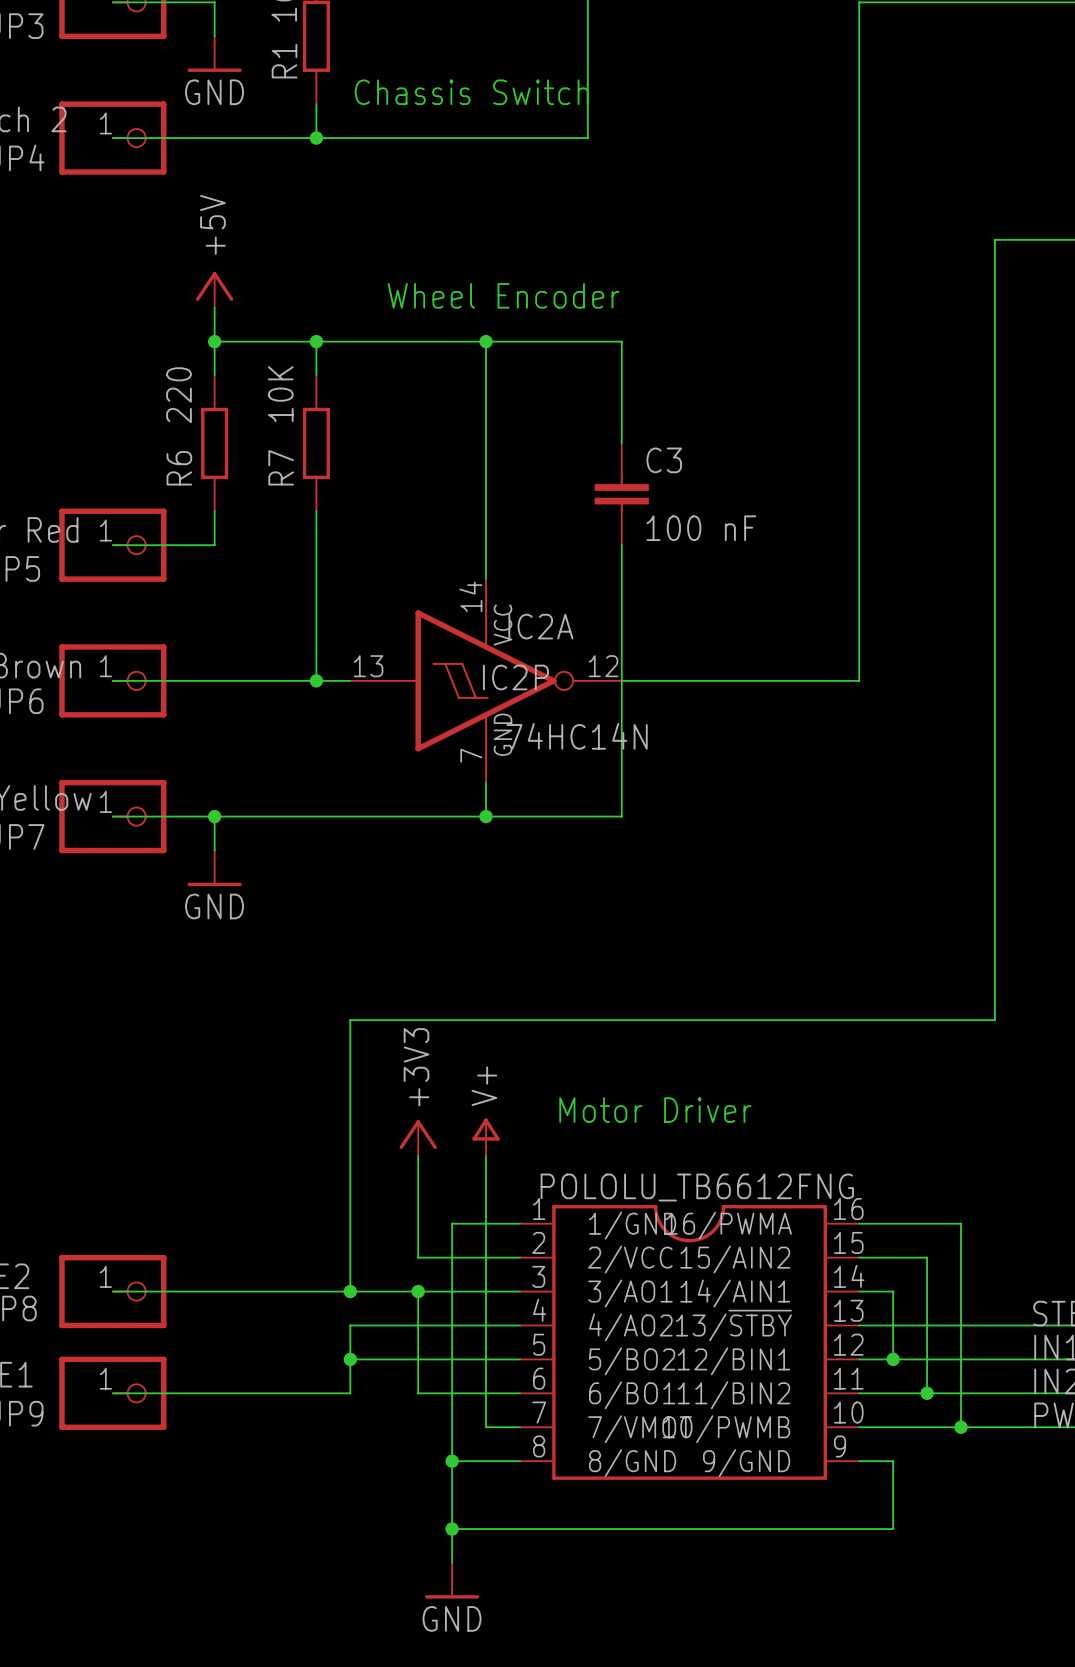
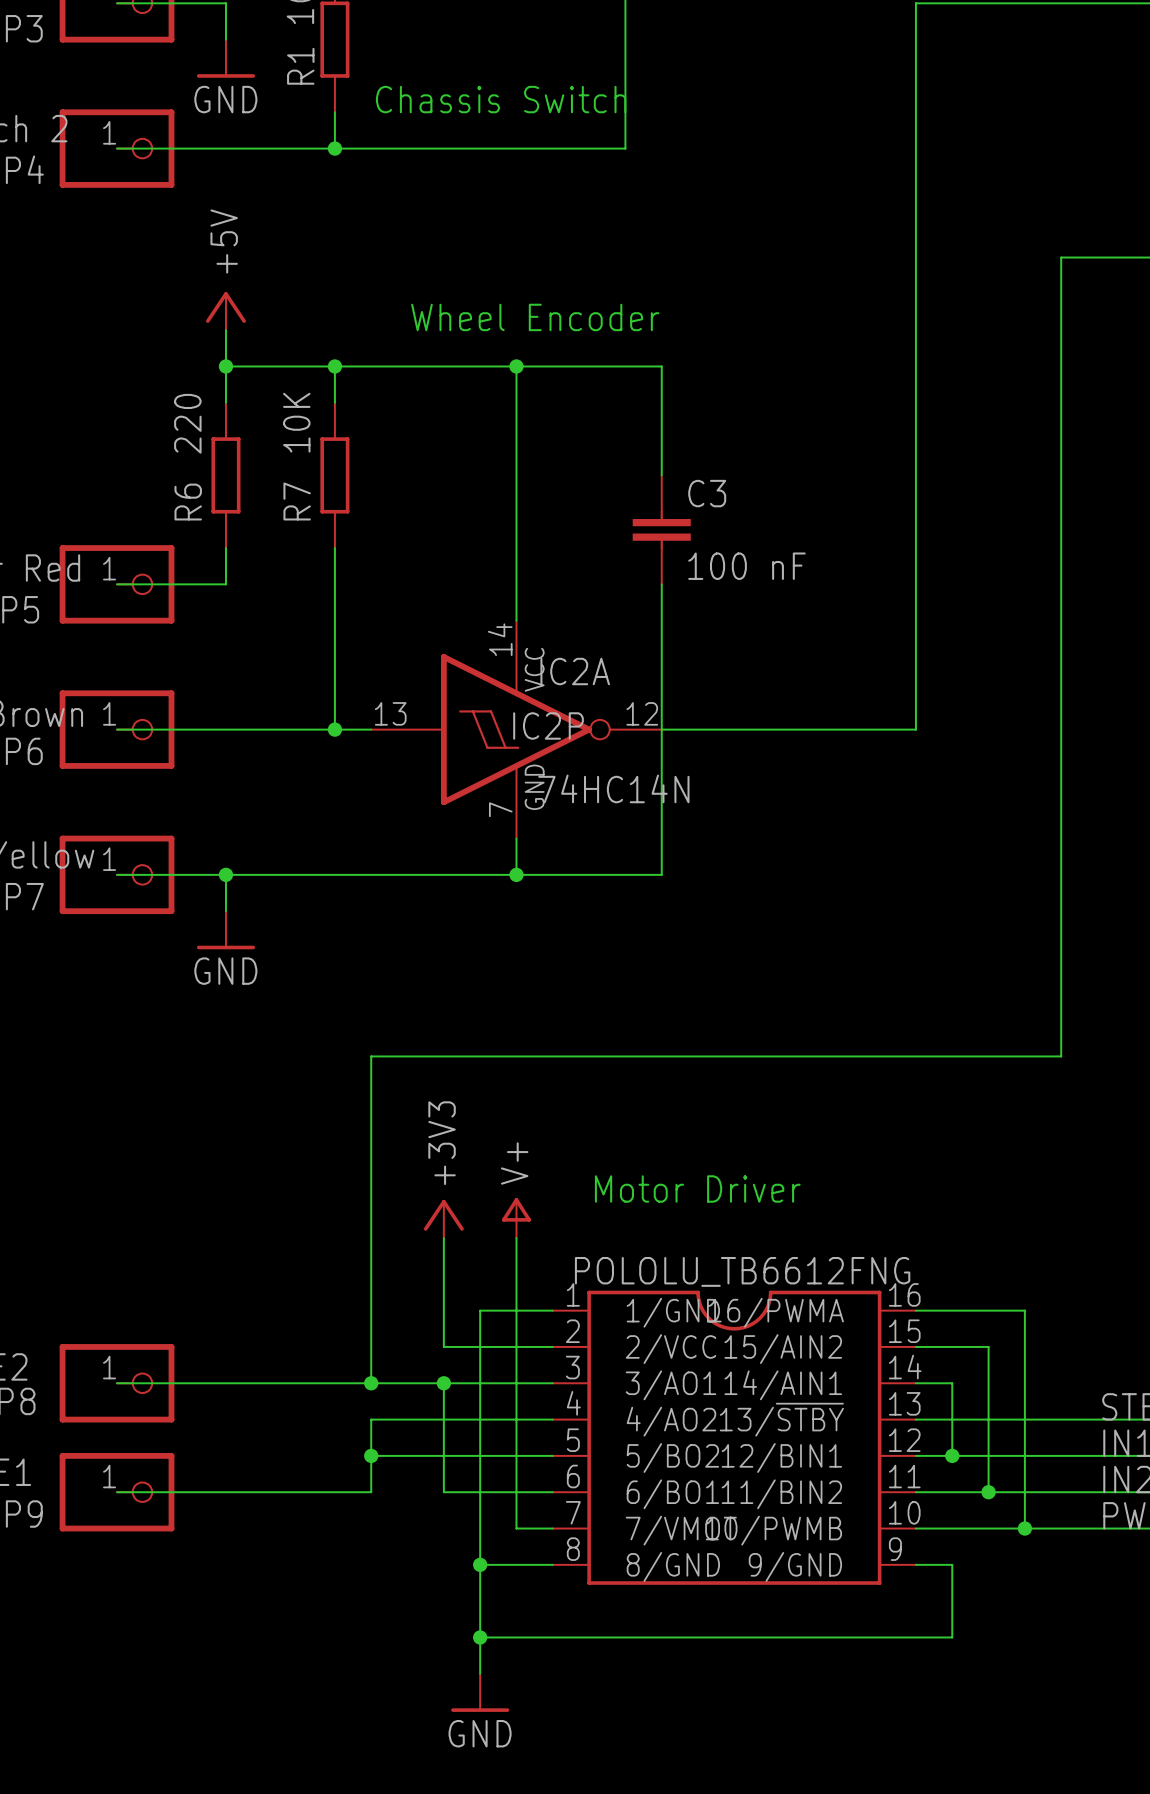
wire: (994, 986) (994, 1020) (350, 1020) -> (1061, 1056) (371, 1056) (371, 1092)

